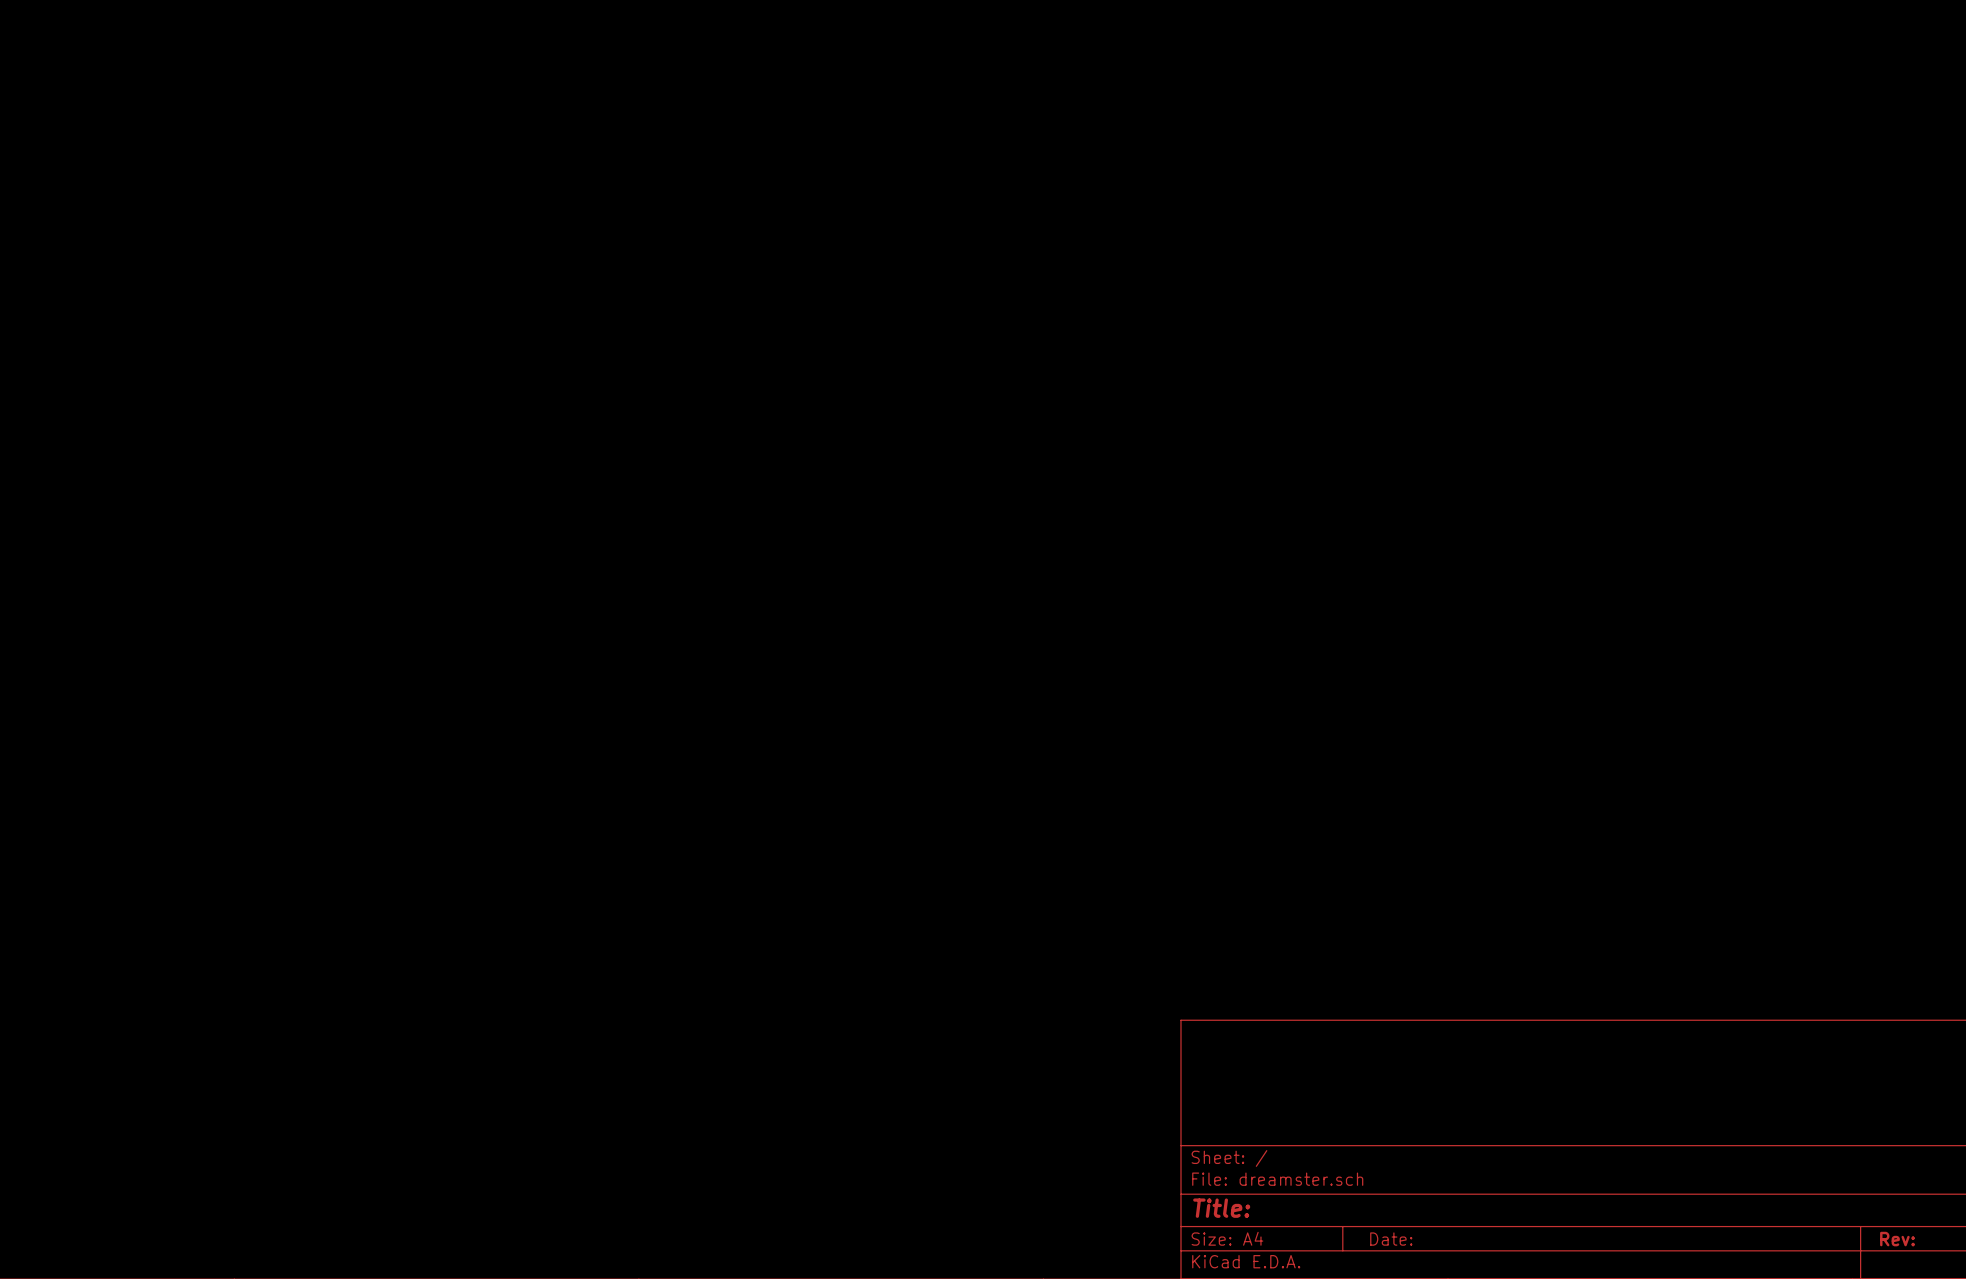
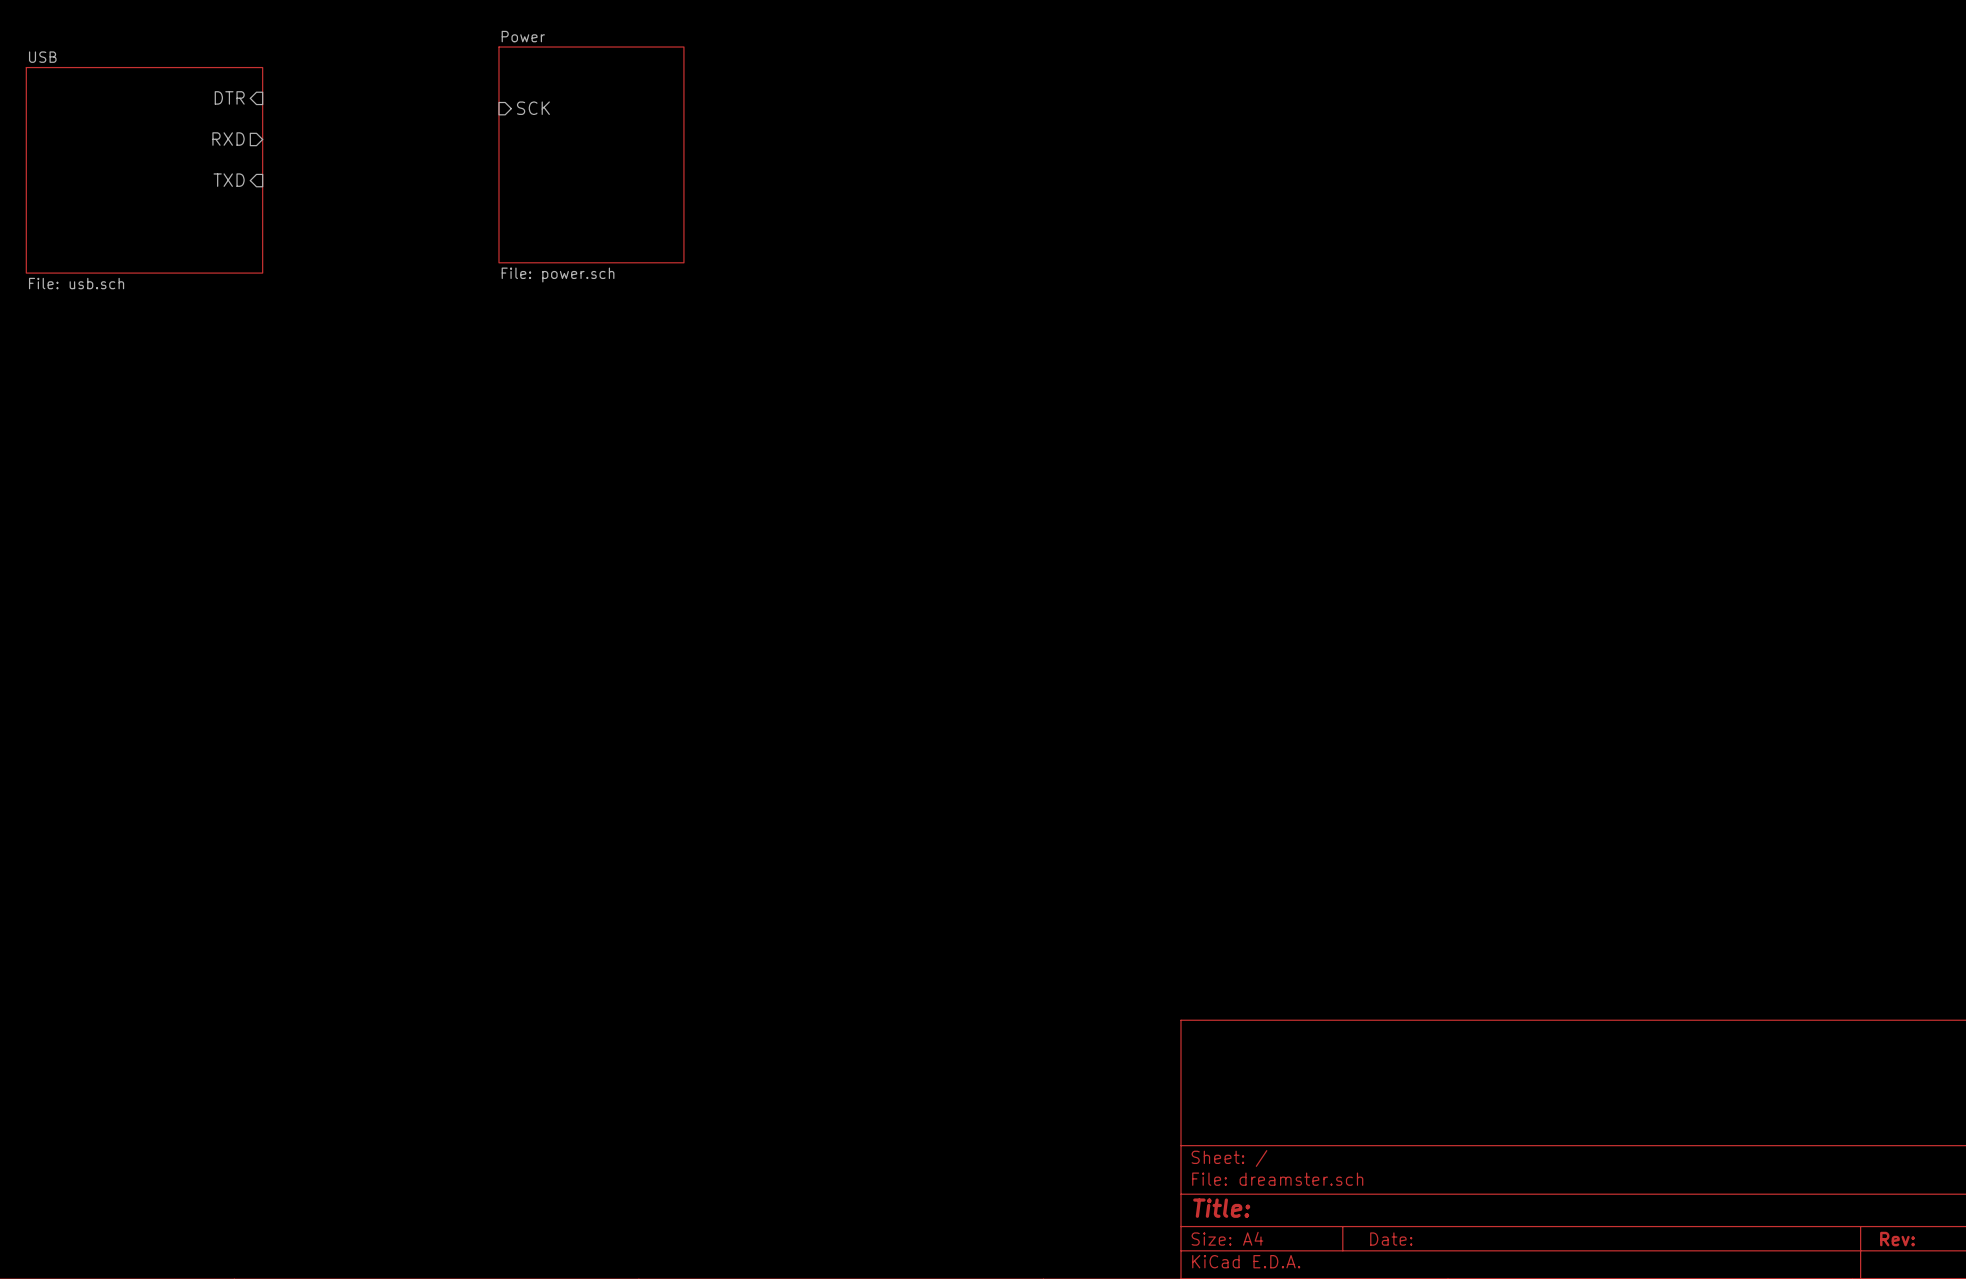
sheet pin: none -> DTR (229, 97)
sheet pin: none -> SCK (533, 108)
sheet pin: none -> RXD (228, 139)
sheet Power: none -> File: power.sch (591, 154)
sheet USB: none -> File: usb.sch (144, 170)
sheet pin: none -> TXD (229, 180)

